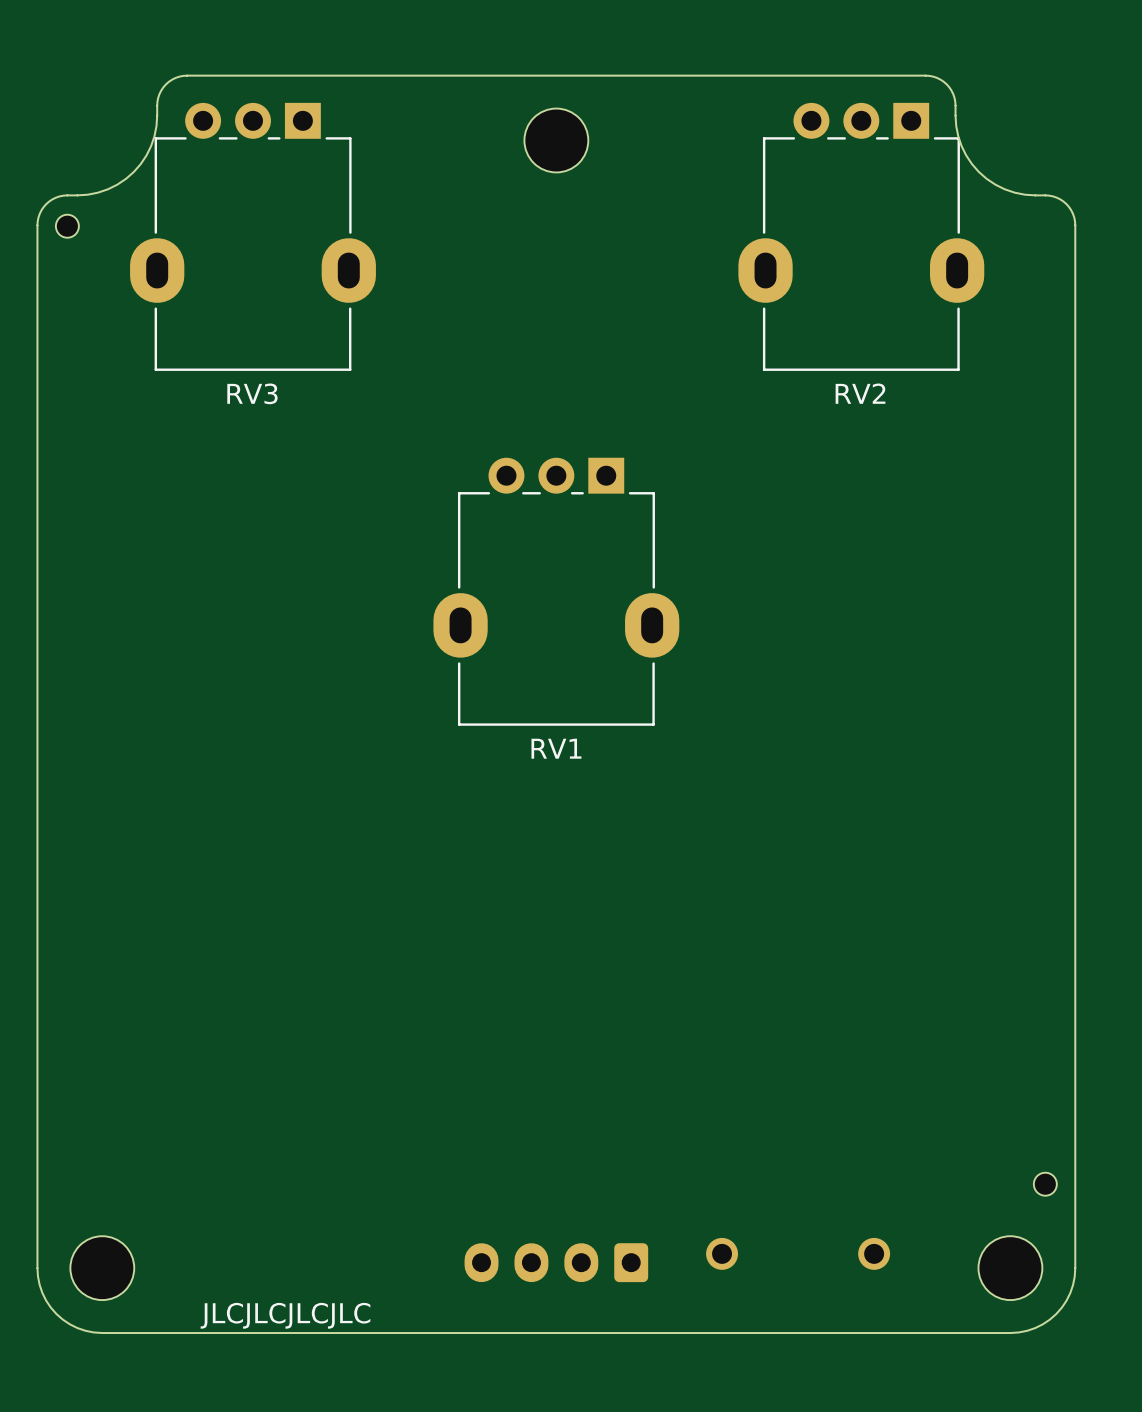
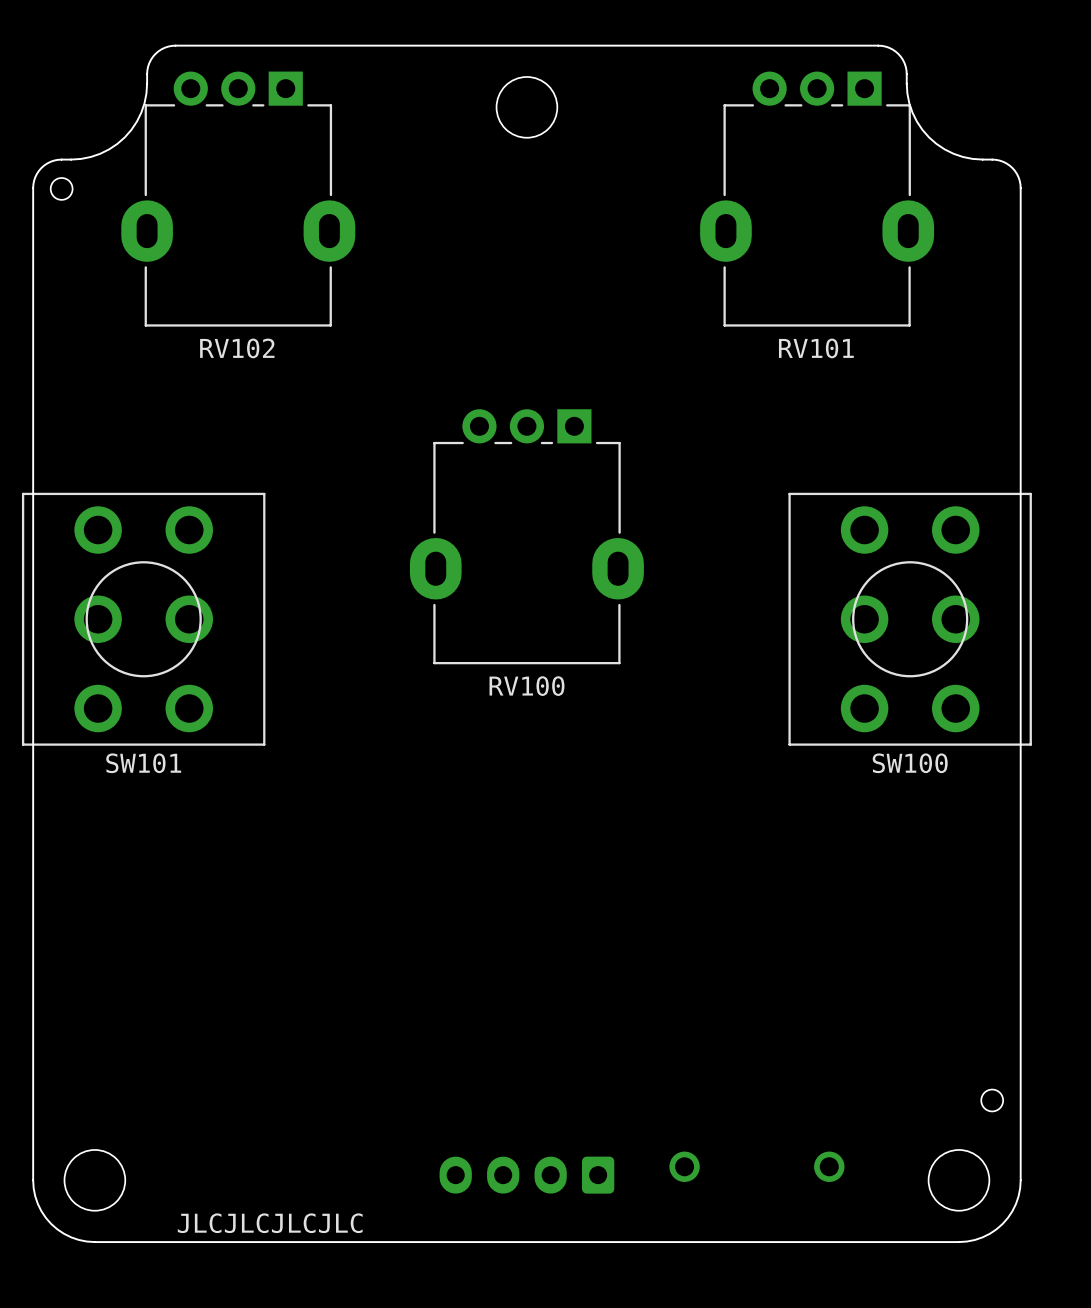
RV3 name: RV3 (252, 393) -> RV102 (237, 348)
RV2 name: RV2 (860, 393) -> RV101 (816, 348)
SW101: none -> (143, 619)
SW100: none -> (910, 619)
RV1 name: RV1 (556, 748) -> RV100 (526, 686)

